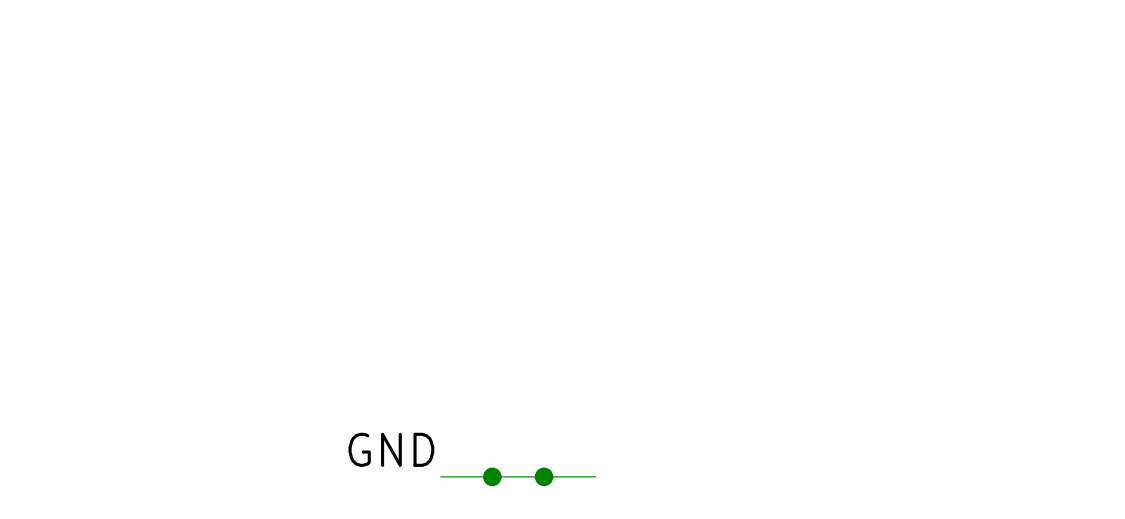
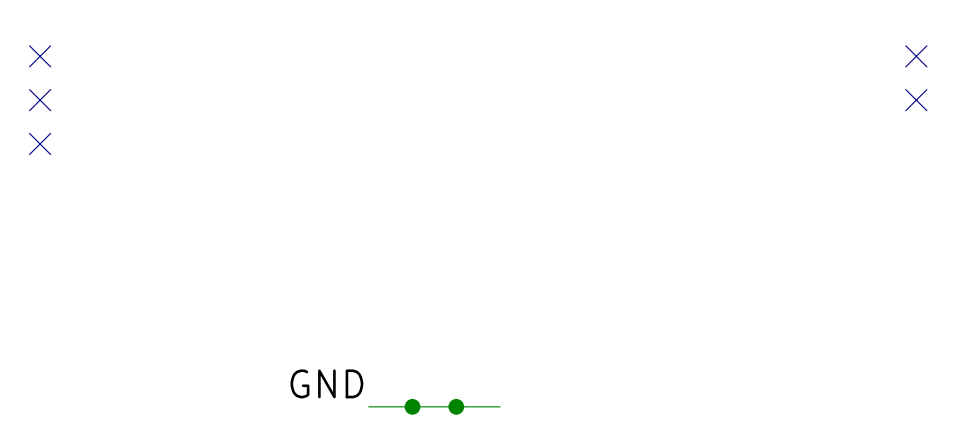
no-connect mark: none -> (40, 56)
no-connect mark: none -> (916, 56)
no-connect mark: none -> (40, 100)
no-connect mark: none -> (916, 100)
no-connect mark: none -> (40, 143)

